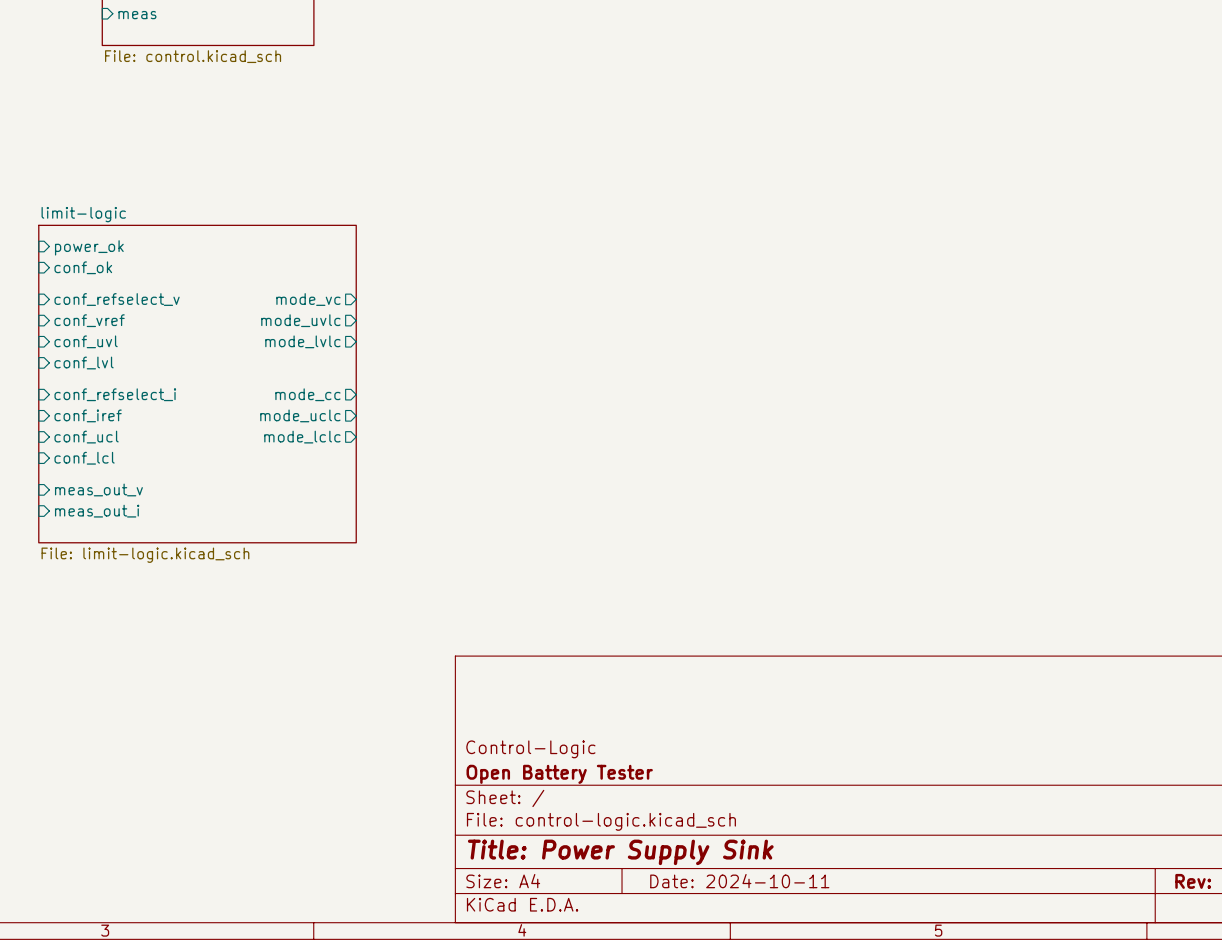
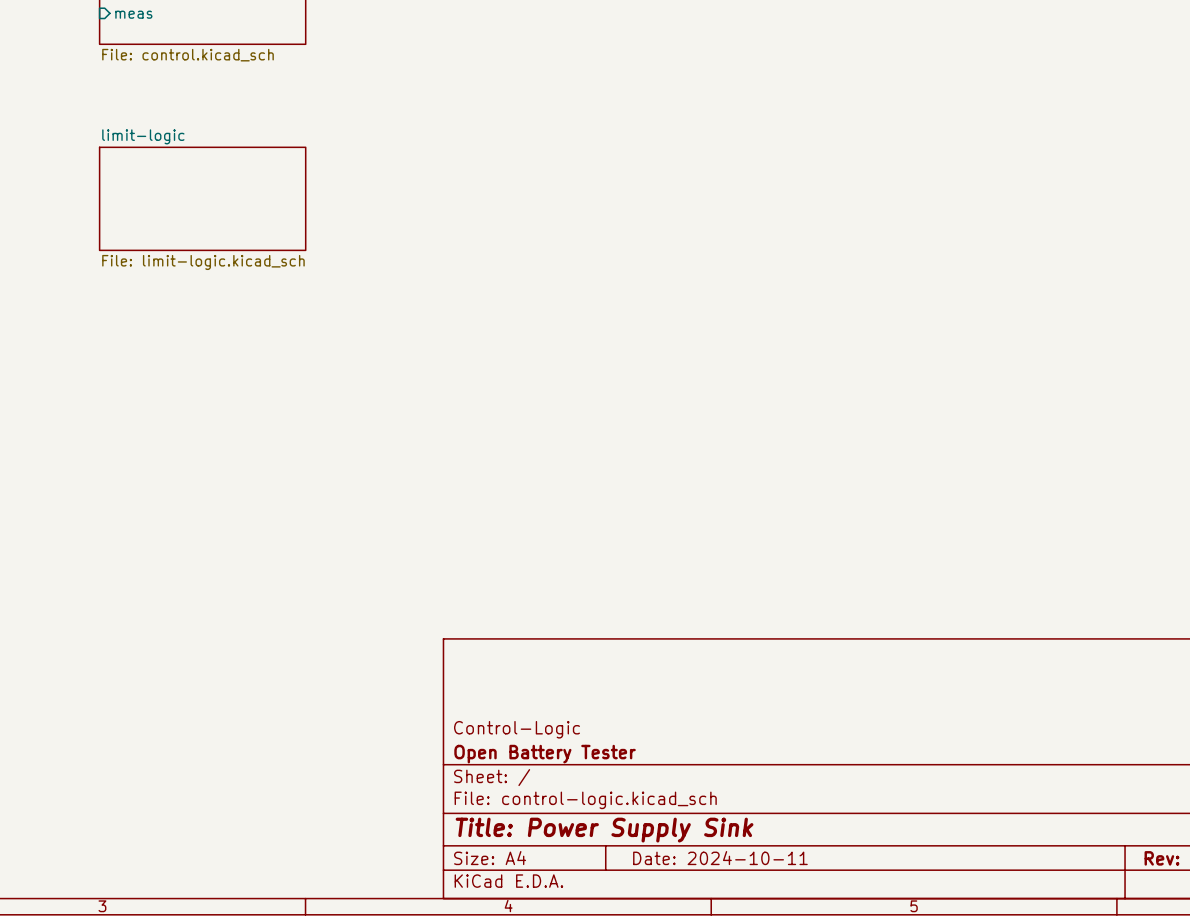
sheet limit-logic: none -> File: limit-logic.kicad_sch (202, 198)
sheet pin: power_ok (89, 247) -> none
sheet pin: conf_ok (83, 267) -> none
sheet pin: conf_refselect_v (117, 299) -> none
sheet pin: mode_vc (308, 299) -> none
sheet pin: conf_vref (89, 320) -> none
sheet pin: mode_uvlc (300, 320) -> none
sheet pin: conf_uvl (86, 341) -> none
sheet pin: mode_lvlc (302, 341) -> none
sheet pin: conf_lvl (84, 363) -> none
sheet limit-logic: File: limit-logic.kicad_sch (197, 384) -> none
sheet pin: conf_refselect_i (115, 394) -> none
sheet pin: mode_cc (307, 394) -> none
sheet pin: conf_iref (88, 415) -> none
sheet pin: mode_uclc (300, 415) -> none
sheet pin: conf_ucl (86, 437) -> none
sheet pin: mode_lclc (302, 437) -> none
sheet pin: conf_lcl (84, 458) -> none
sheet pin: meas_out_v (98, 489) -> none
sheet pin: meas_out_i (97, 511) -> none

